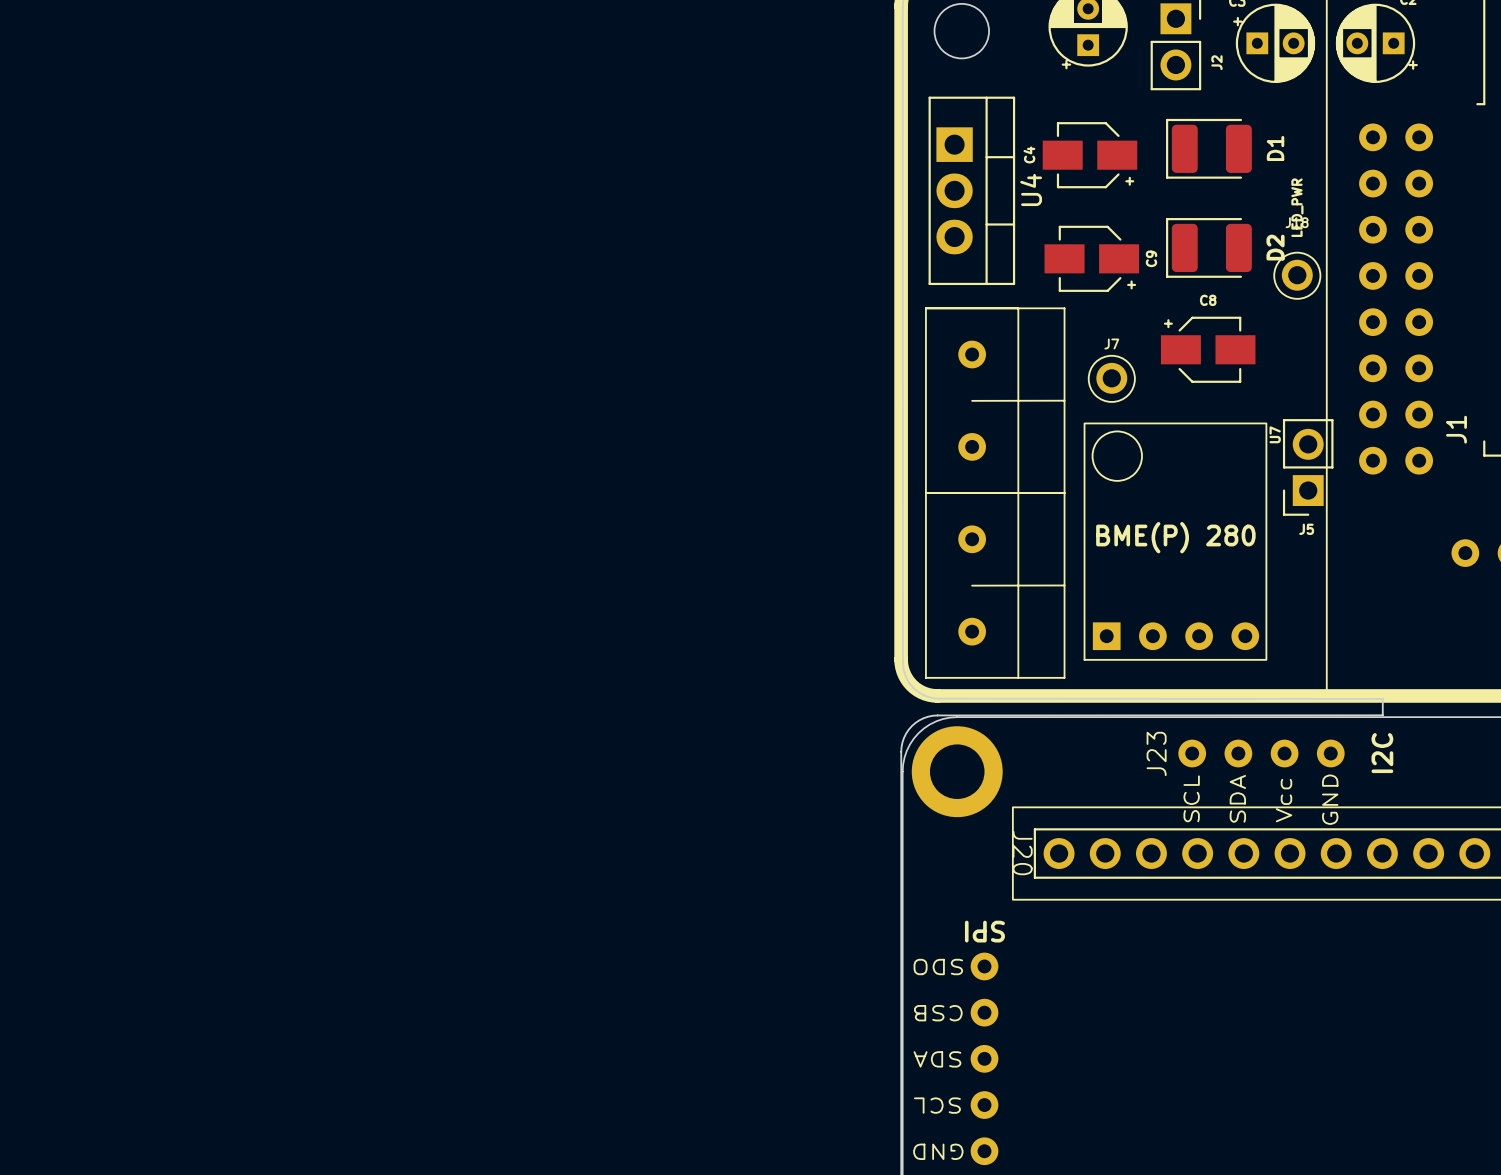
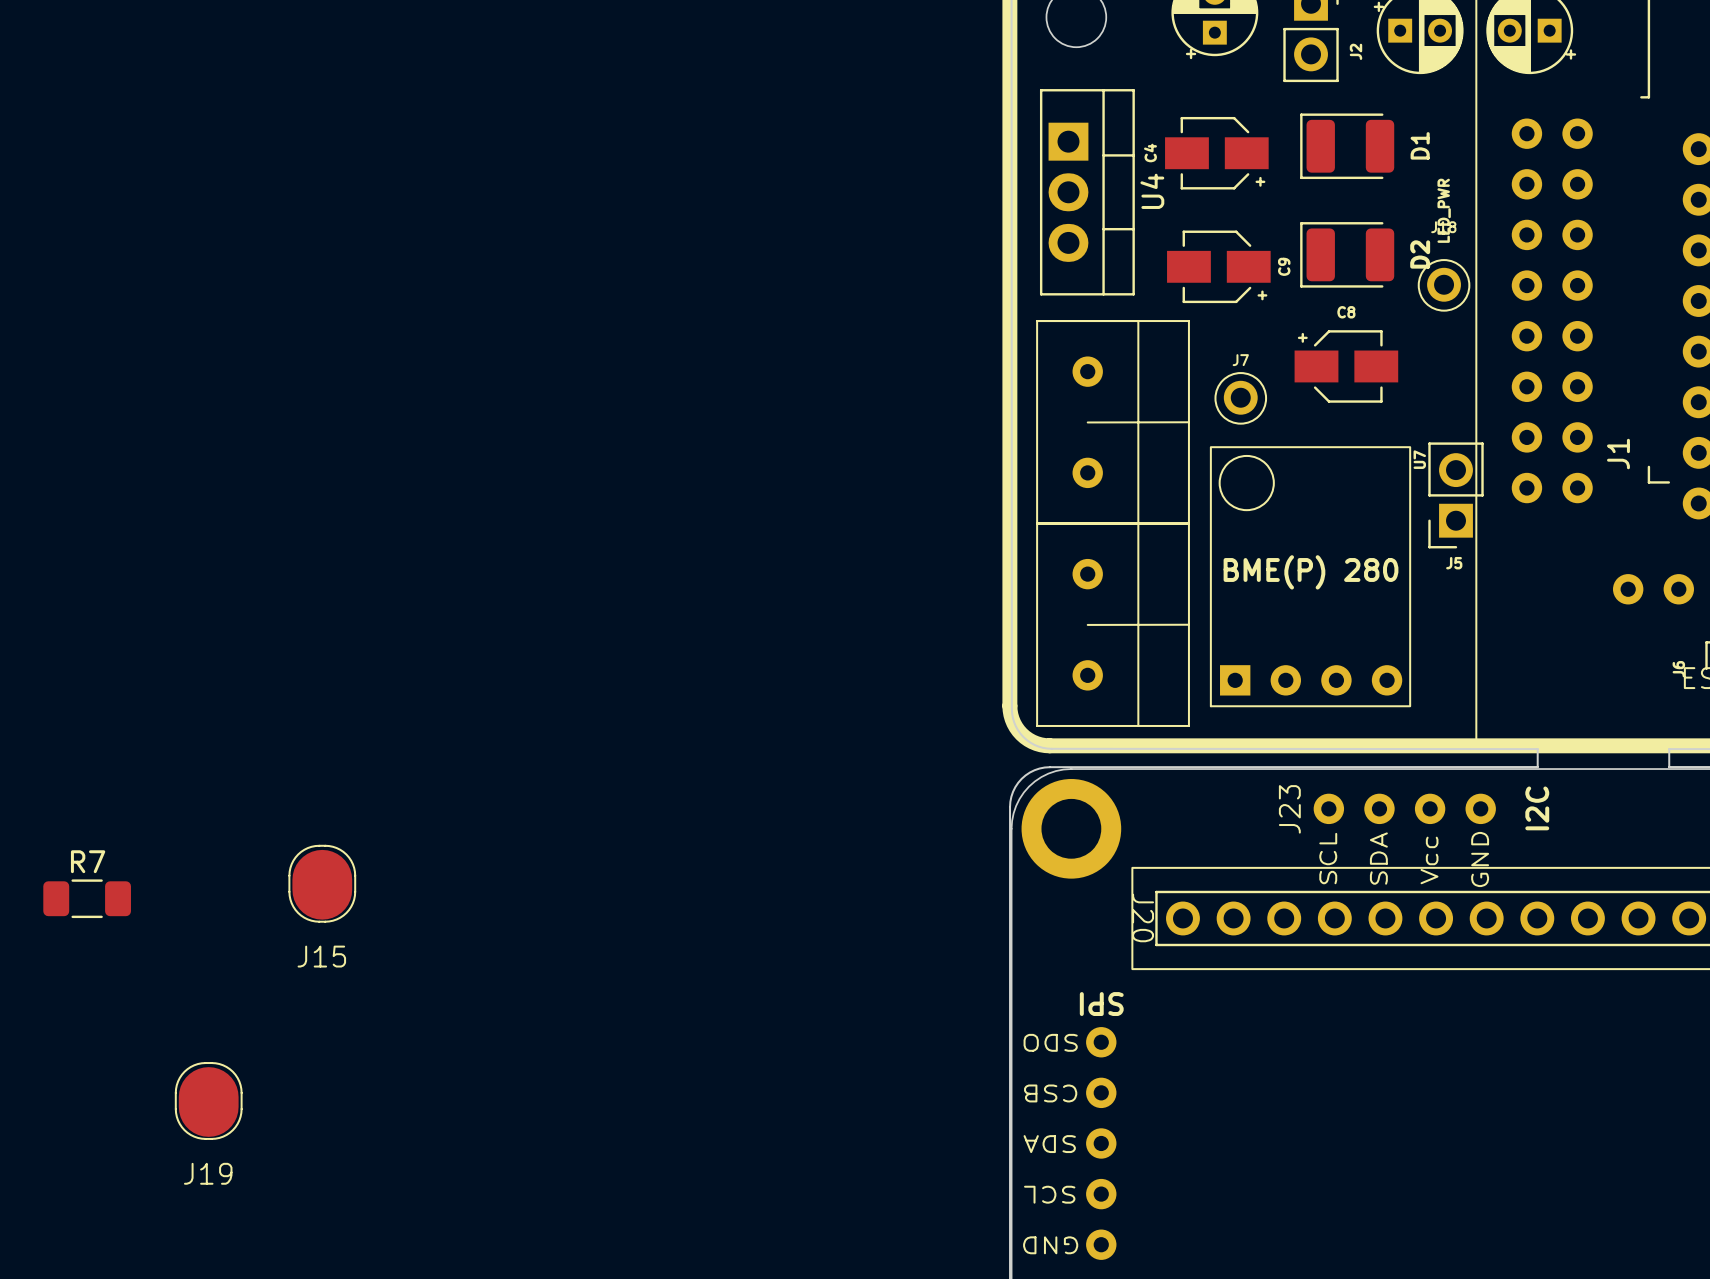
J15: none -> (322, 883)
R7: none -> (87, 898)
J19: none -> (208, 1100)

